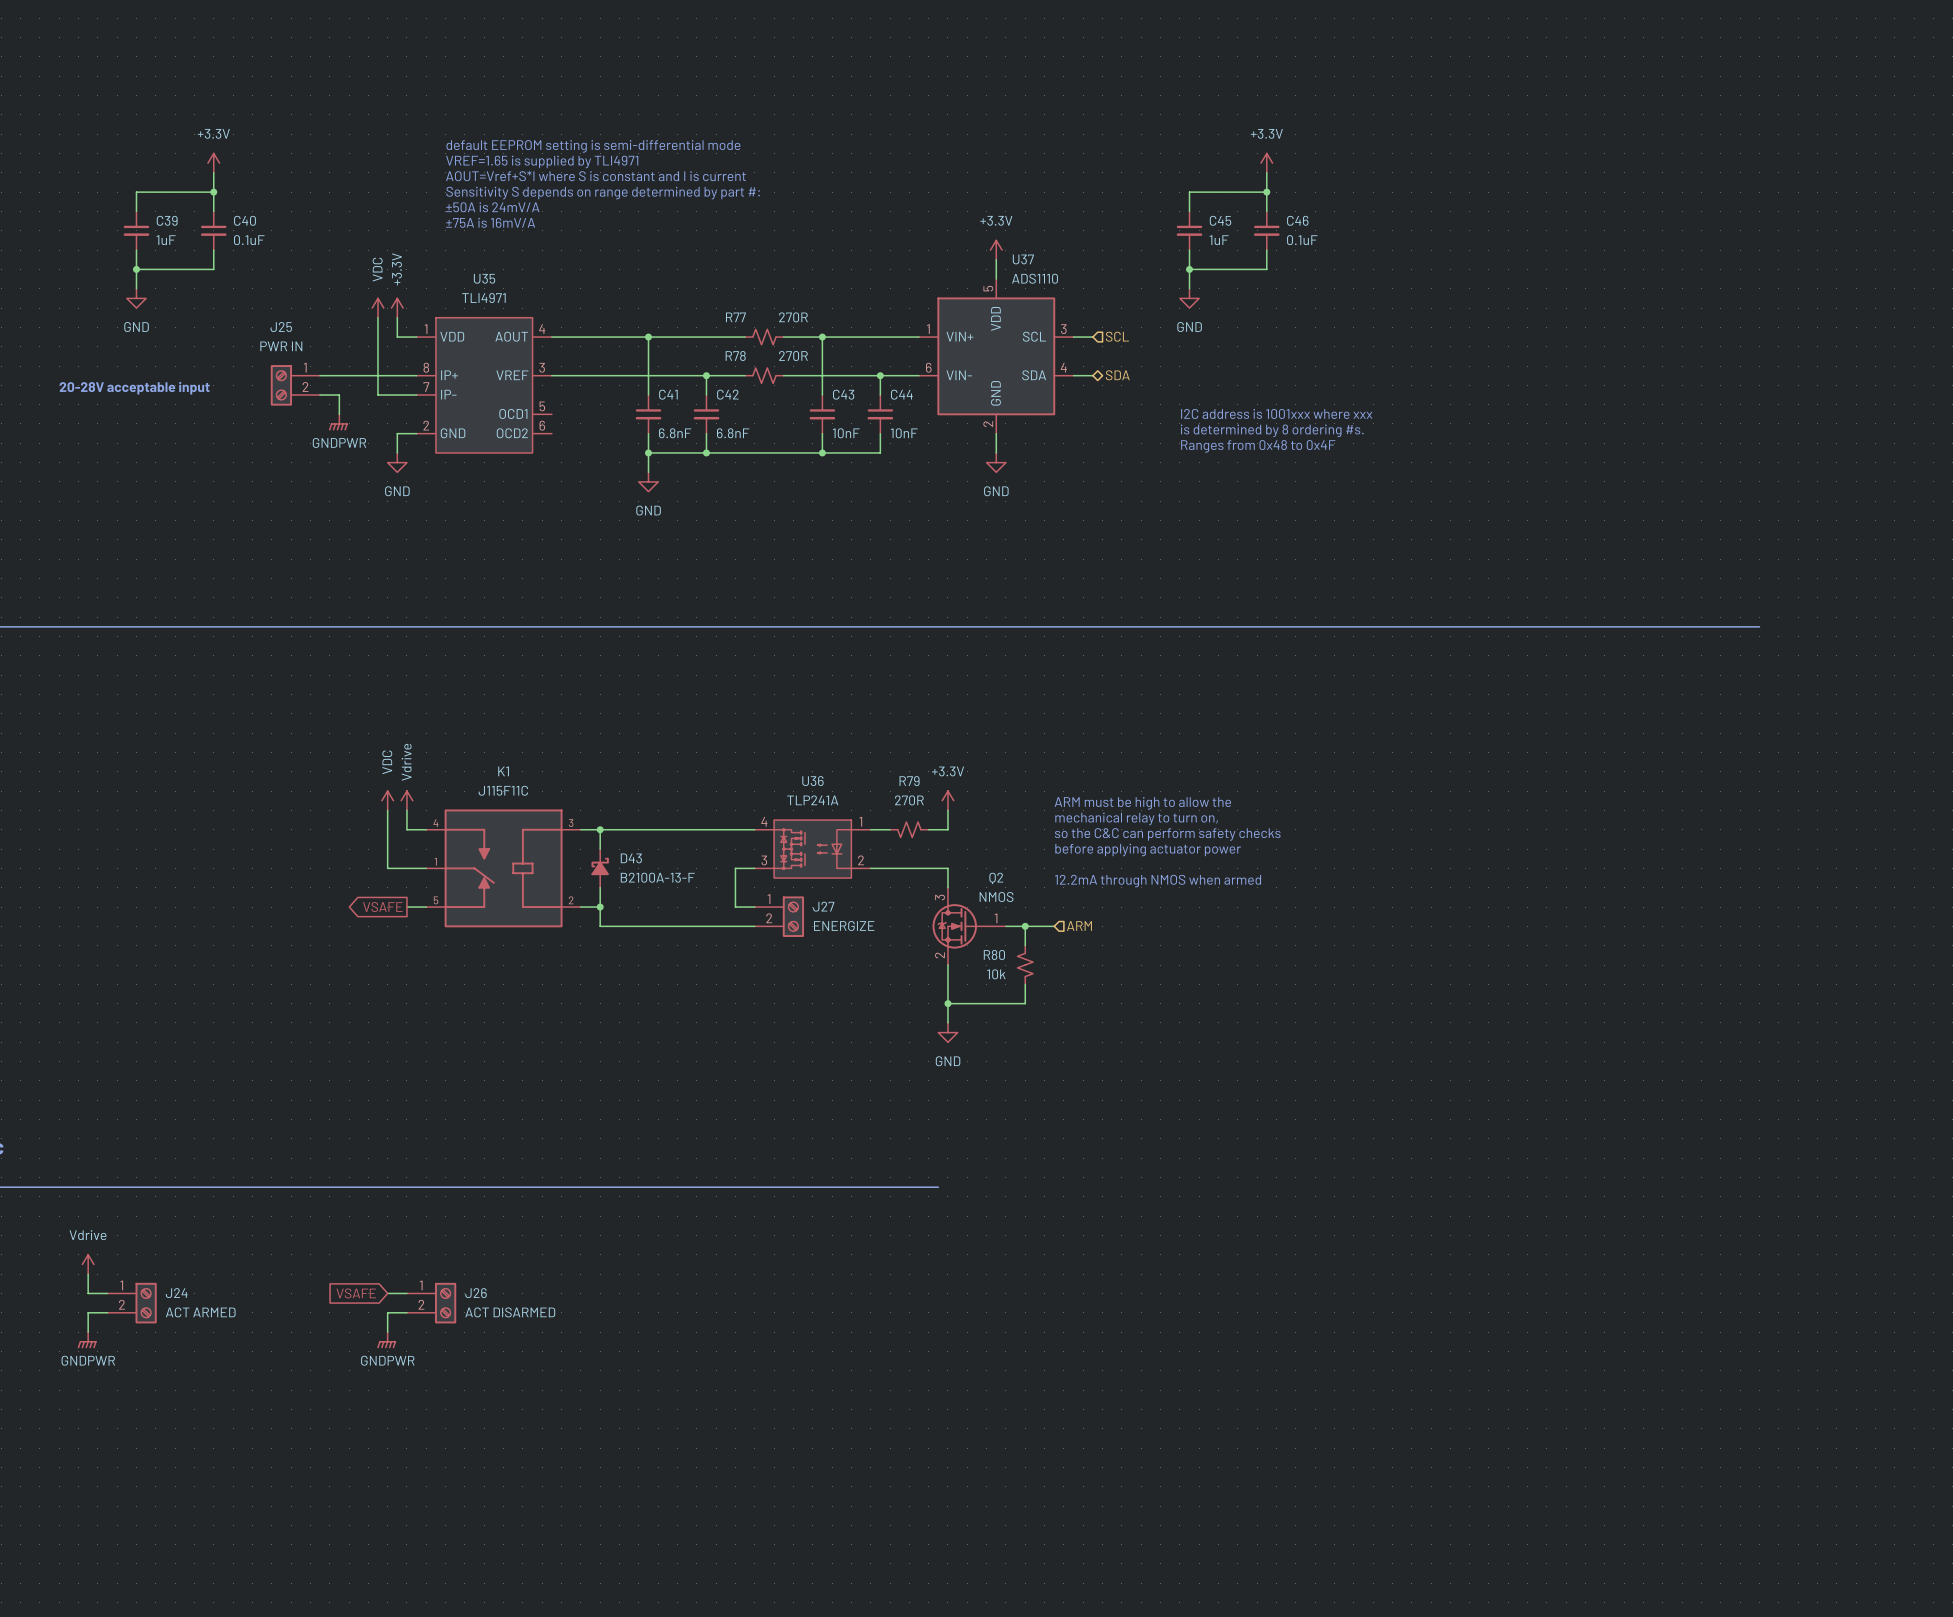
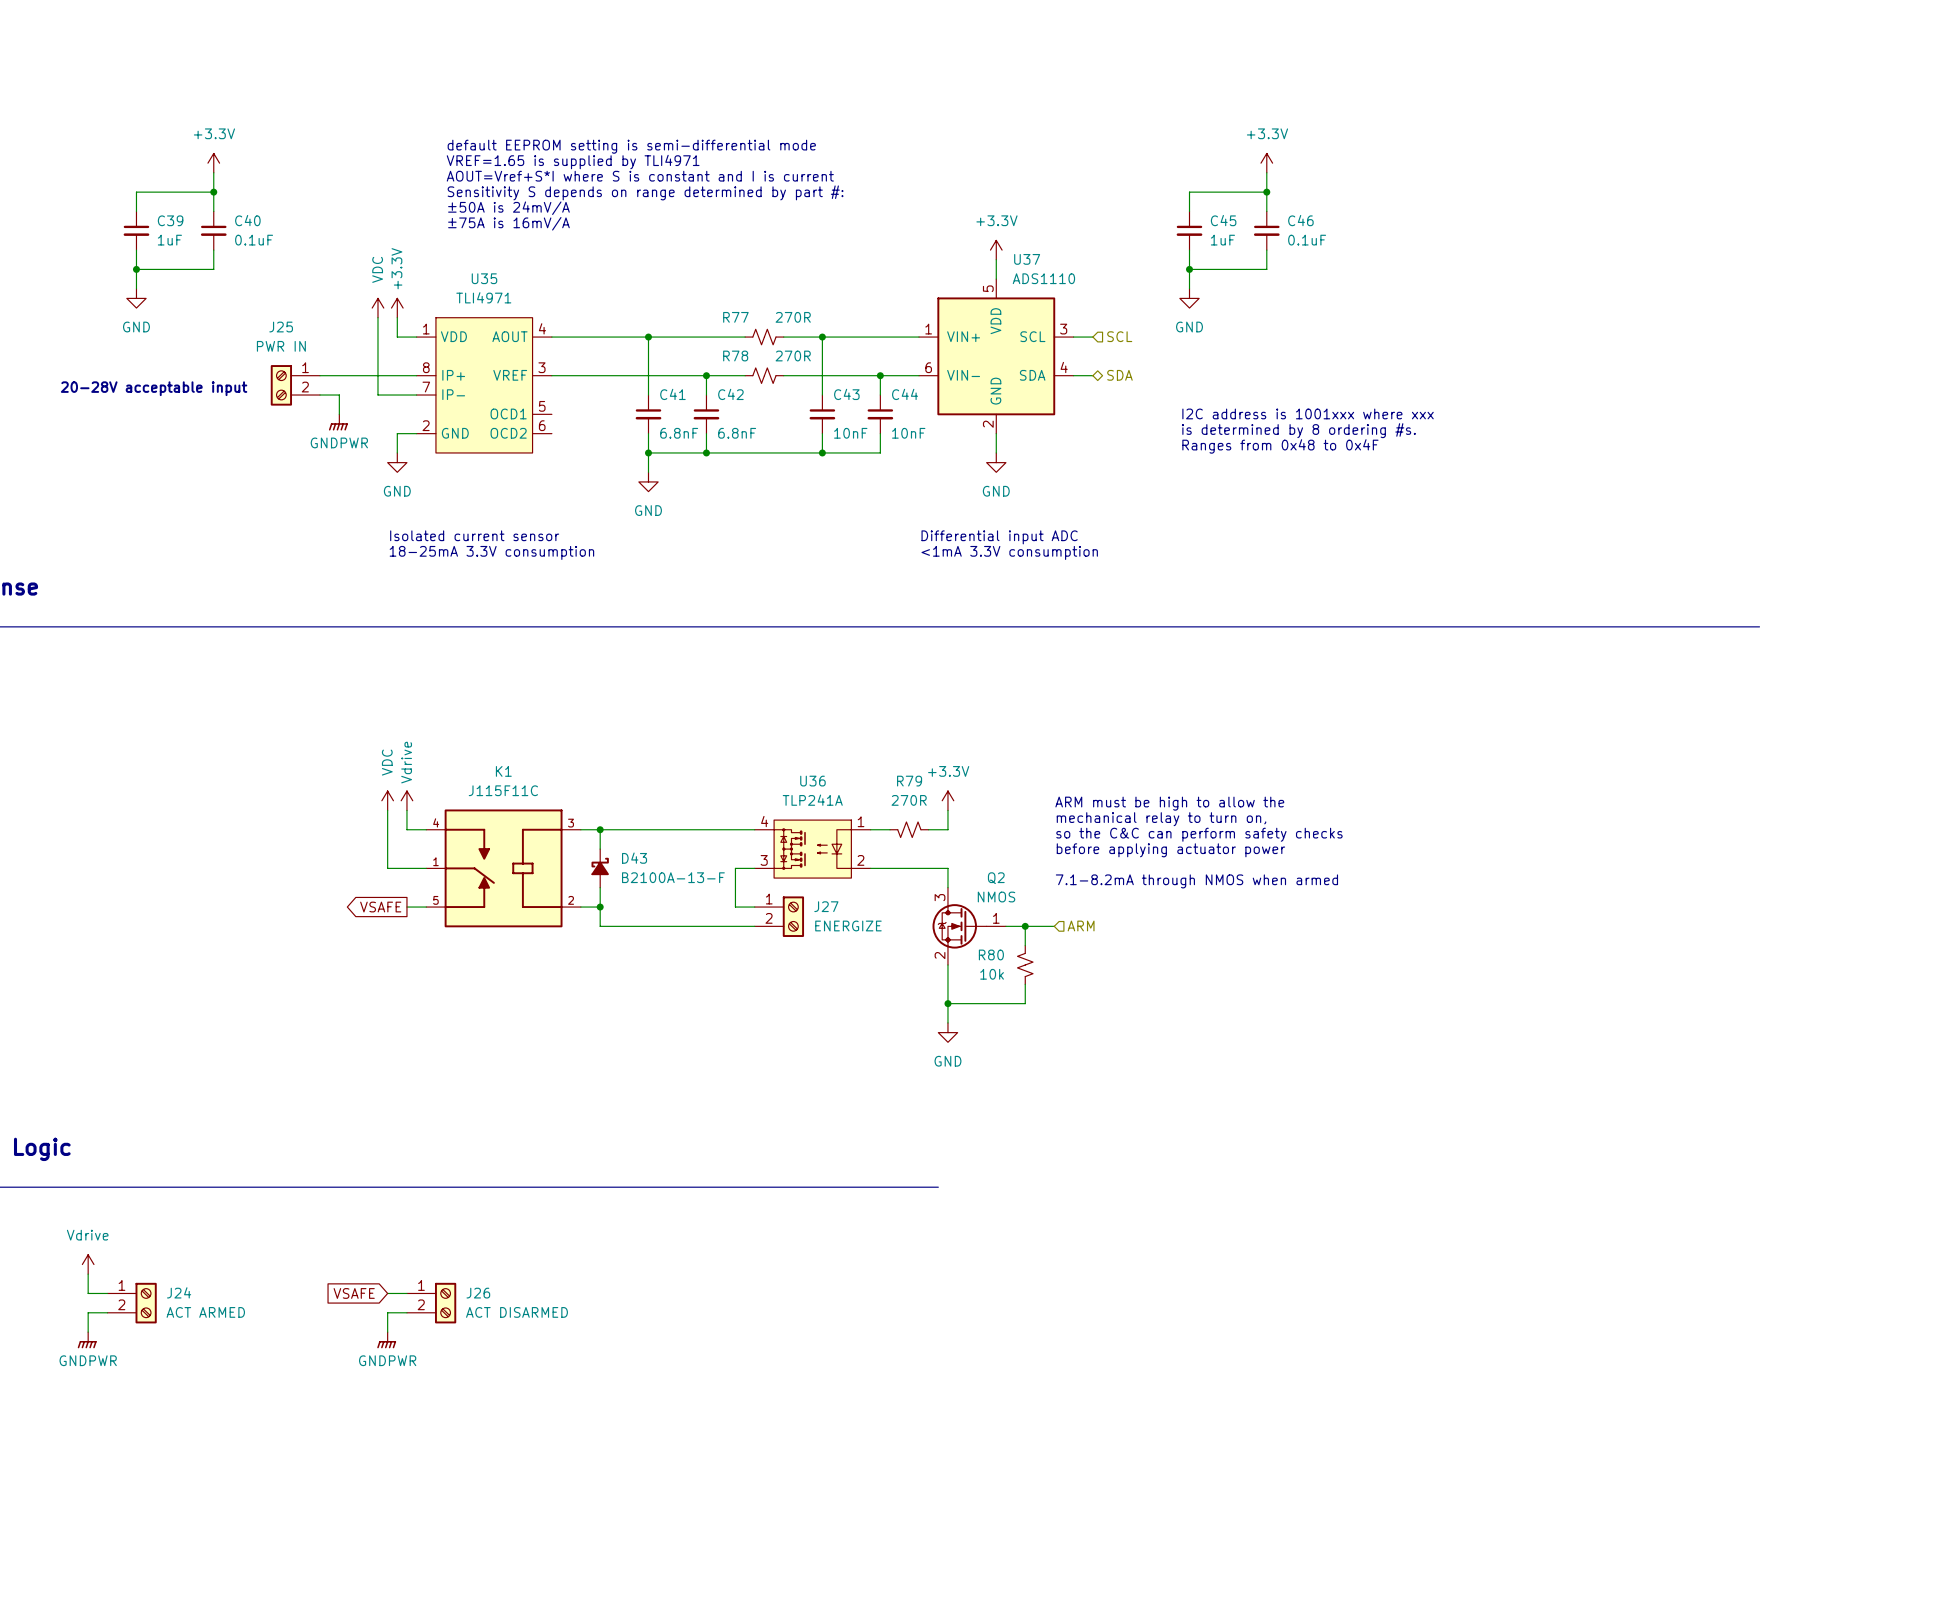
text: none -> Isolated current sensor (474, 535)
text: none -> Differential input ADC (999, 537)
text: none -> 18-25mA 3.3V consumption (491, 552)
text: none -> <1mA 3.3V consumption (1009, 552)
text: 12.2mA through NMOS when armed (1158, 881) -> 7.1-8.2mA through NMOS when armed (1196, 881)

